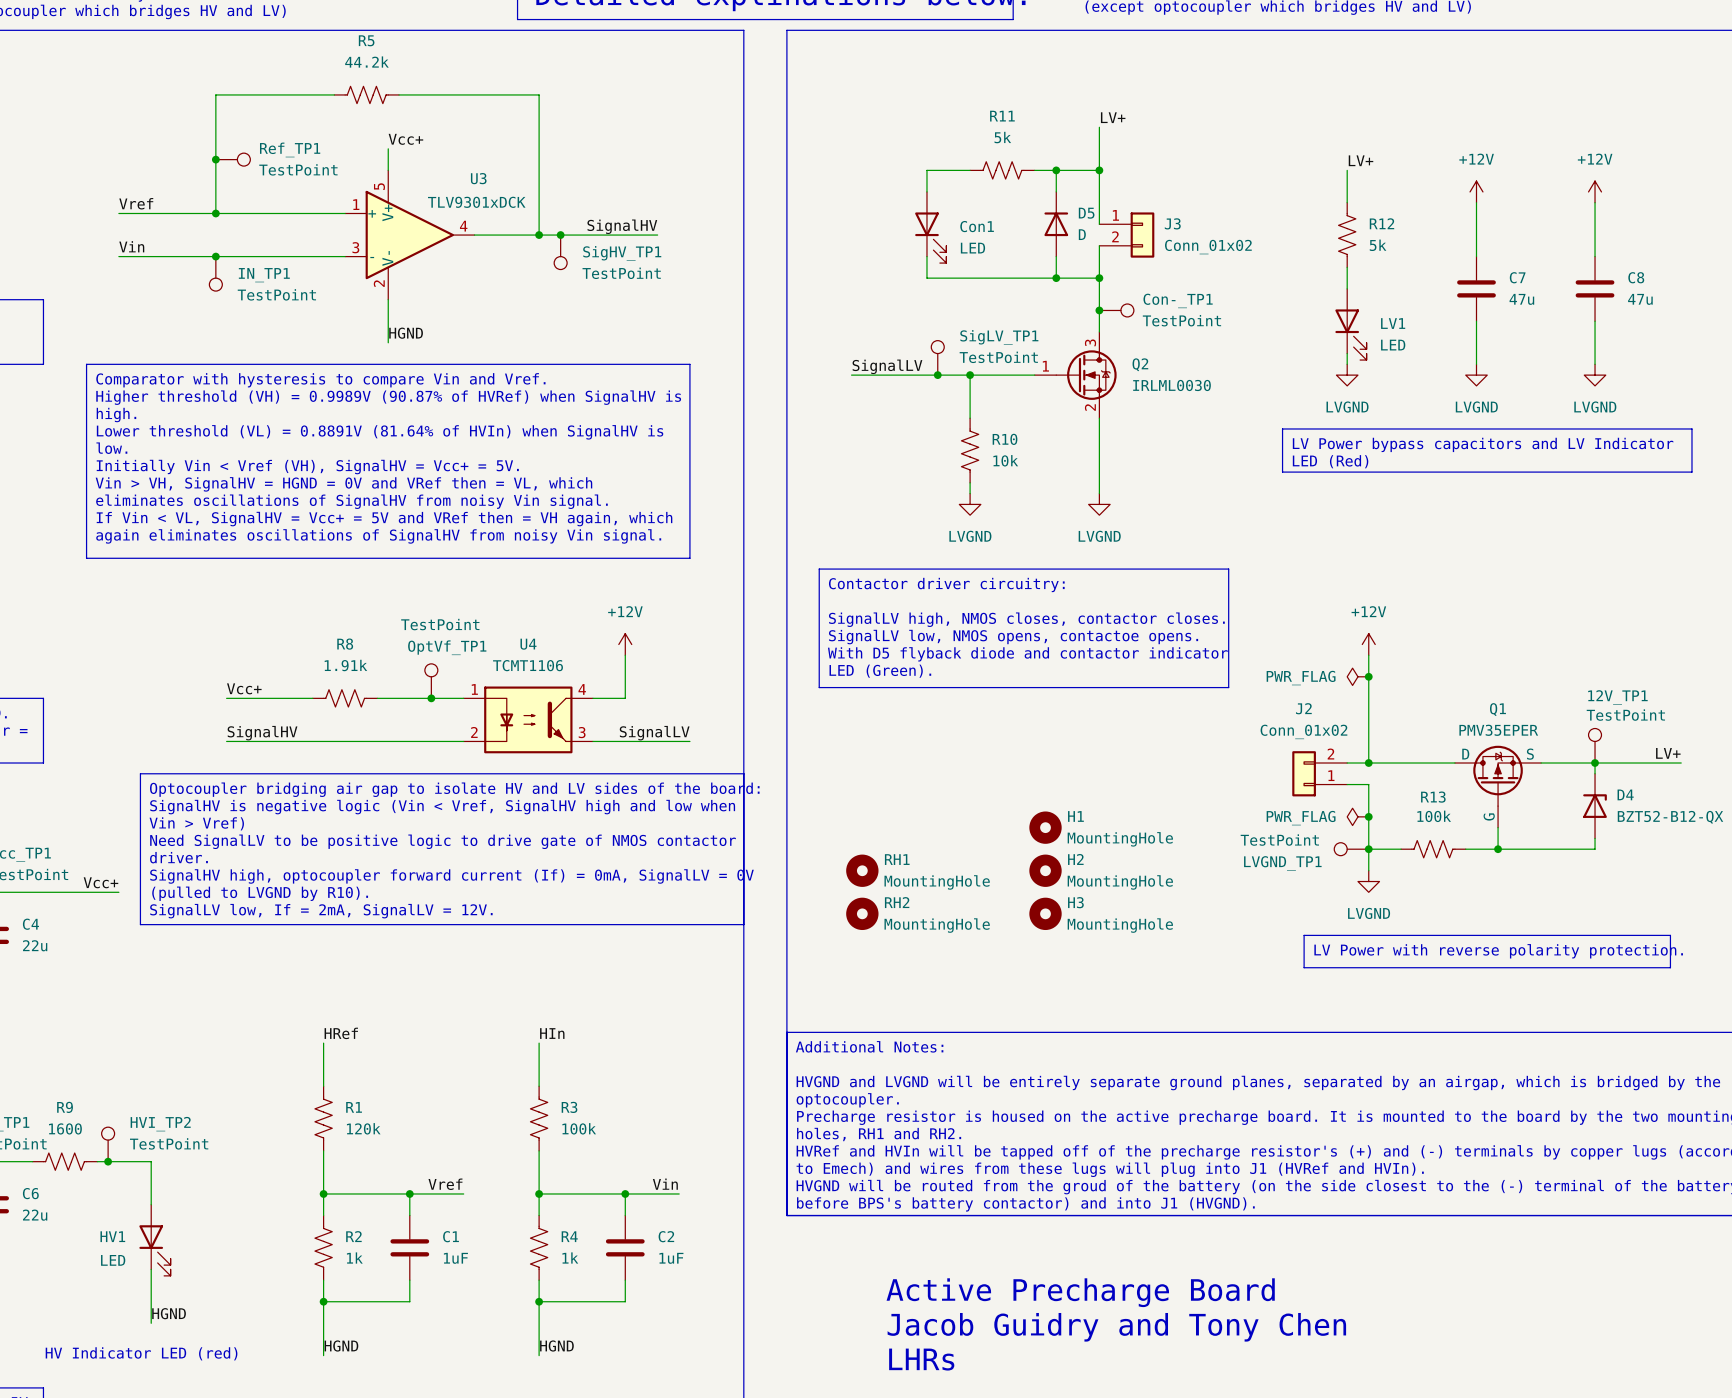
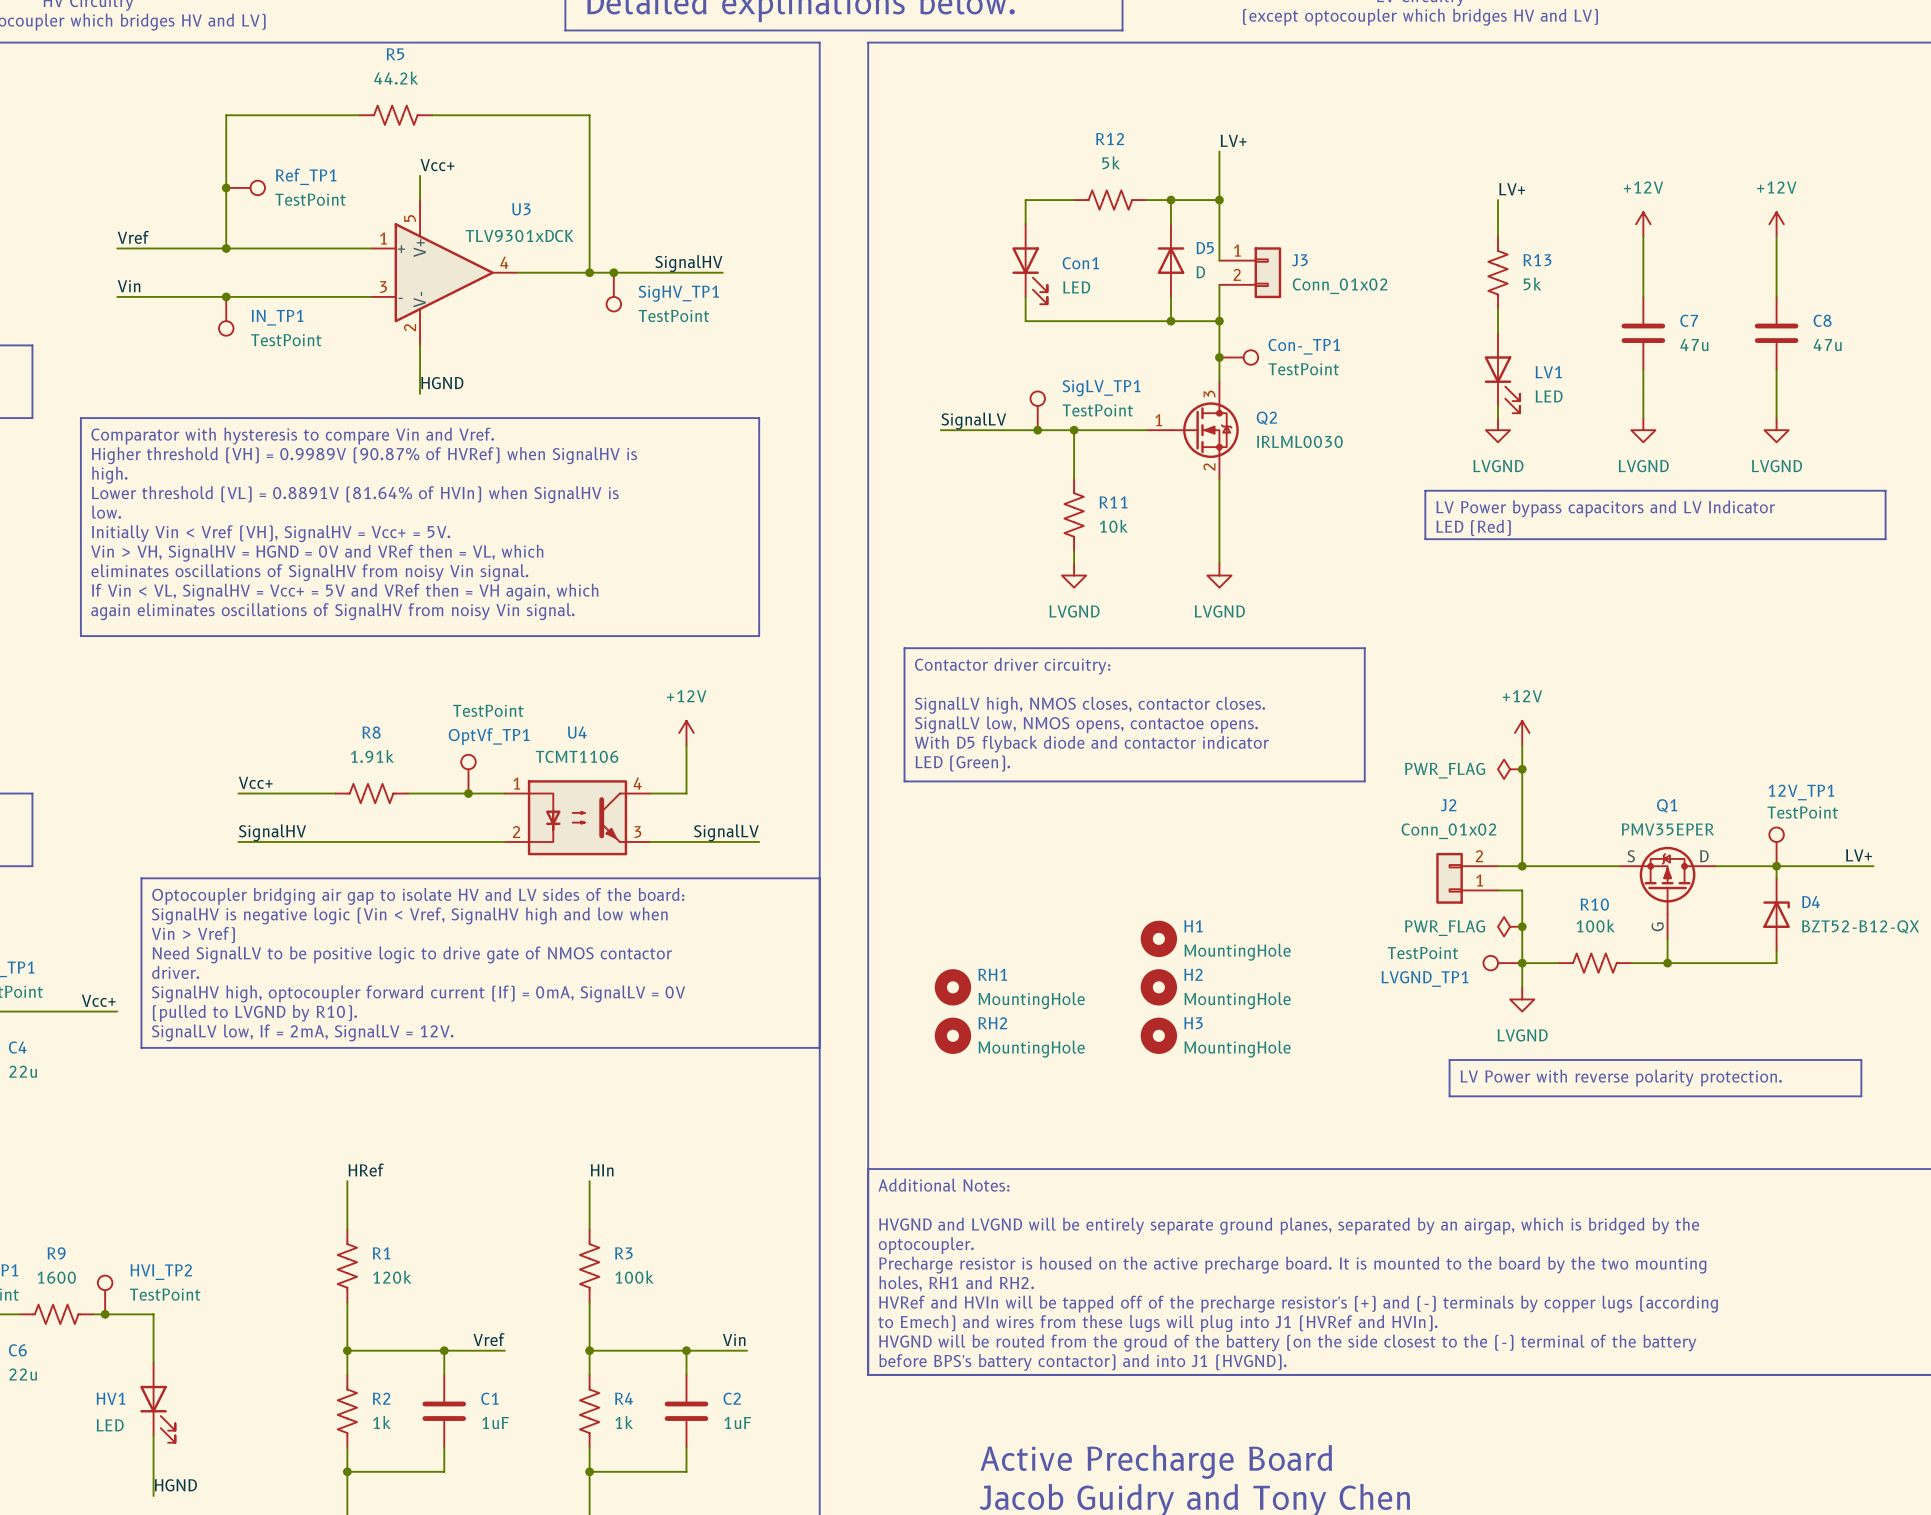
R11 name: R11 (1002, 116) -> R12 (1110, 139)
R12 name: R12 (1381, 223) -> R13 (1537, 260)
R10 name: R10 (1005, 439) -> R11 (1113, 502)
Q1 flip: as is (1498, 775) -> left-right (1667, 880)
R13 name: R13 (1433, 797) -> R10 (1594, 904)

